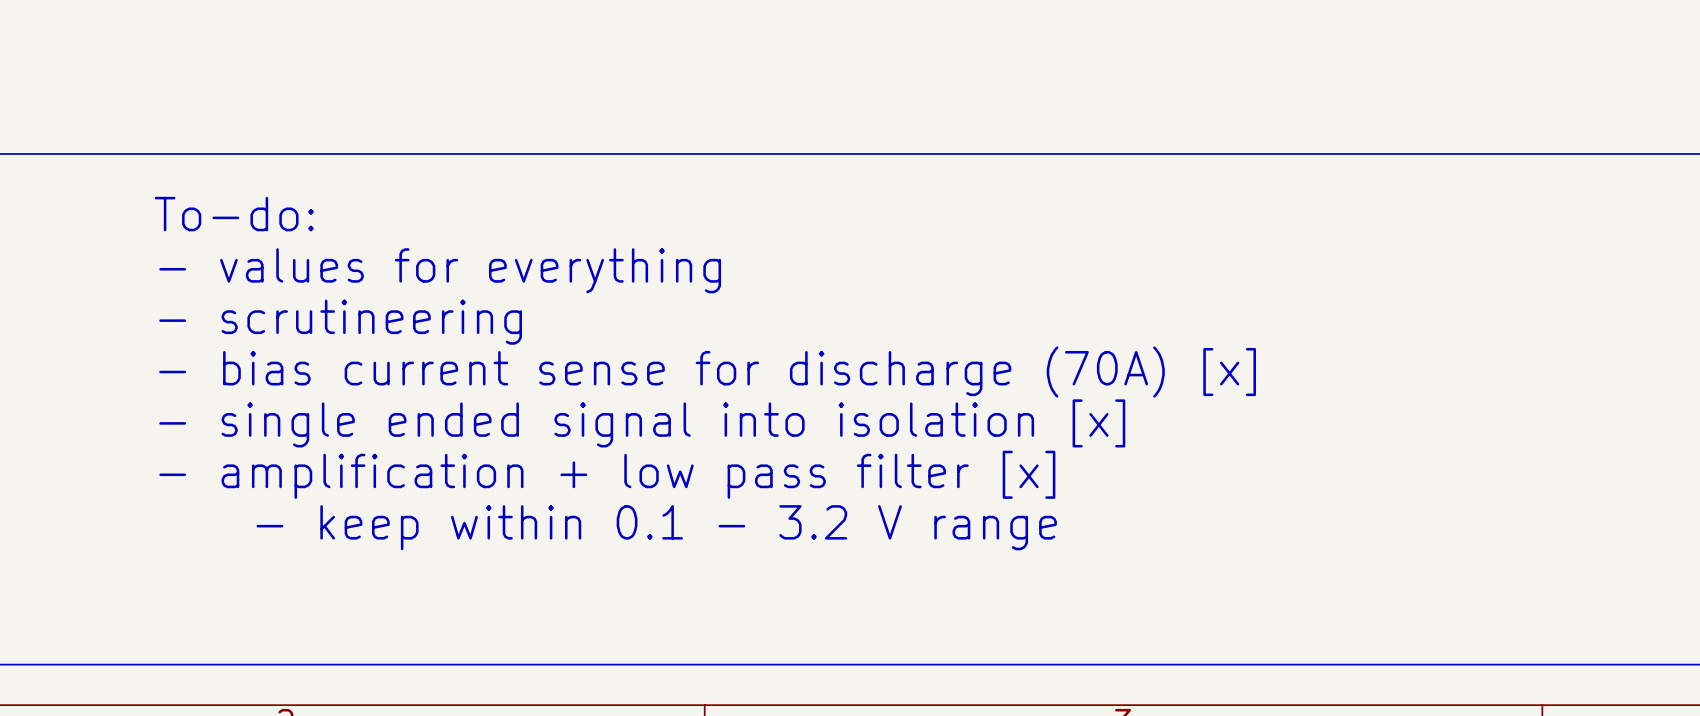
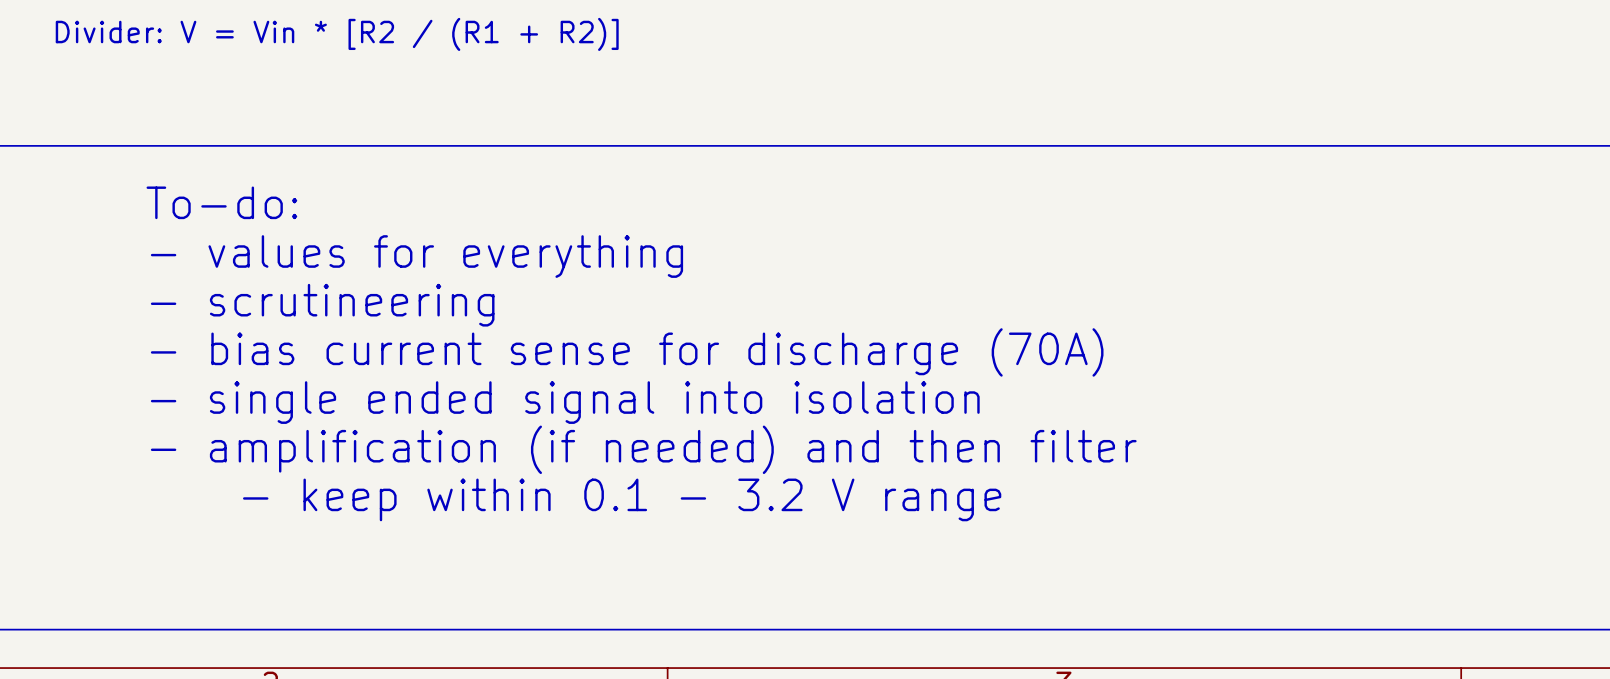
text: none -> Divider: V = Vin * [R2 / (R1 + R2)] (337, 34)
text: - bias current sense for discharge (70A) [x] (707, 372) -> - bias current sense for discharge (70A) (627, 352)
text: - single ended signal into isolation [x] (642, 423) -> - single ended signal into isolation (565, 402)
text: - amplification + low pass filter [x] (607, 474) -> - amplification (if needed) and then filter (643, 449)

